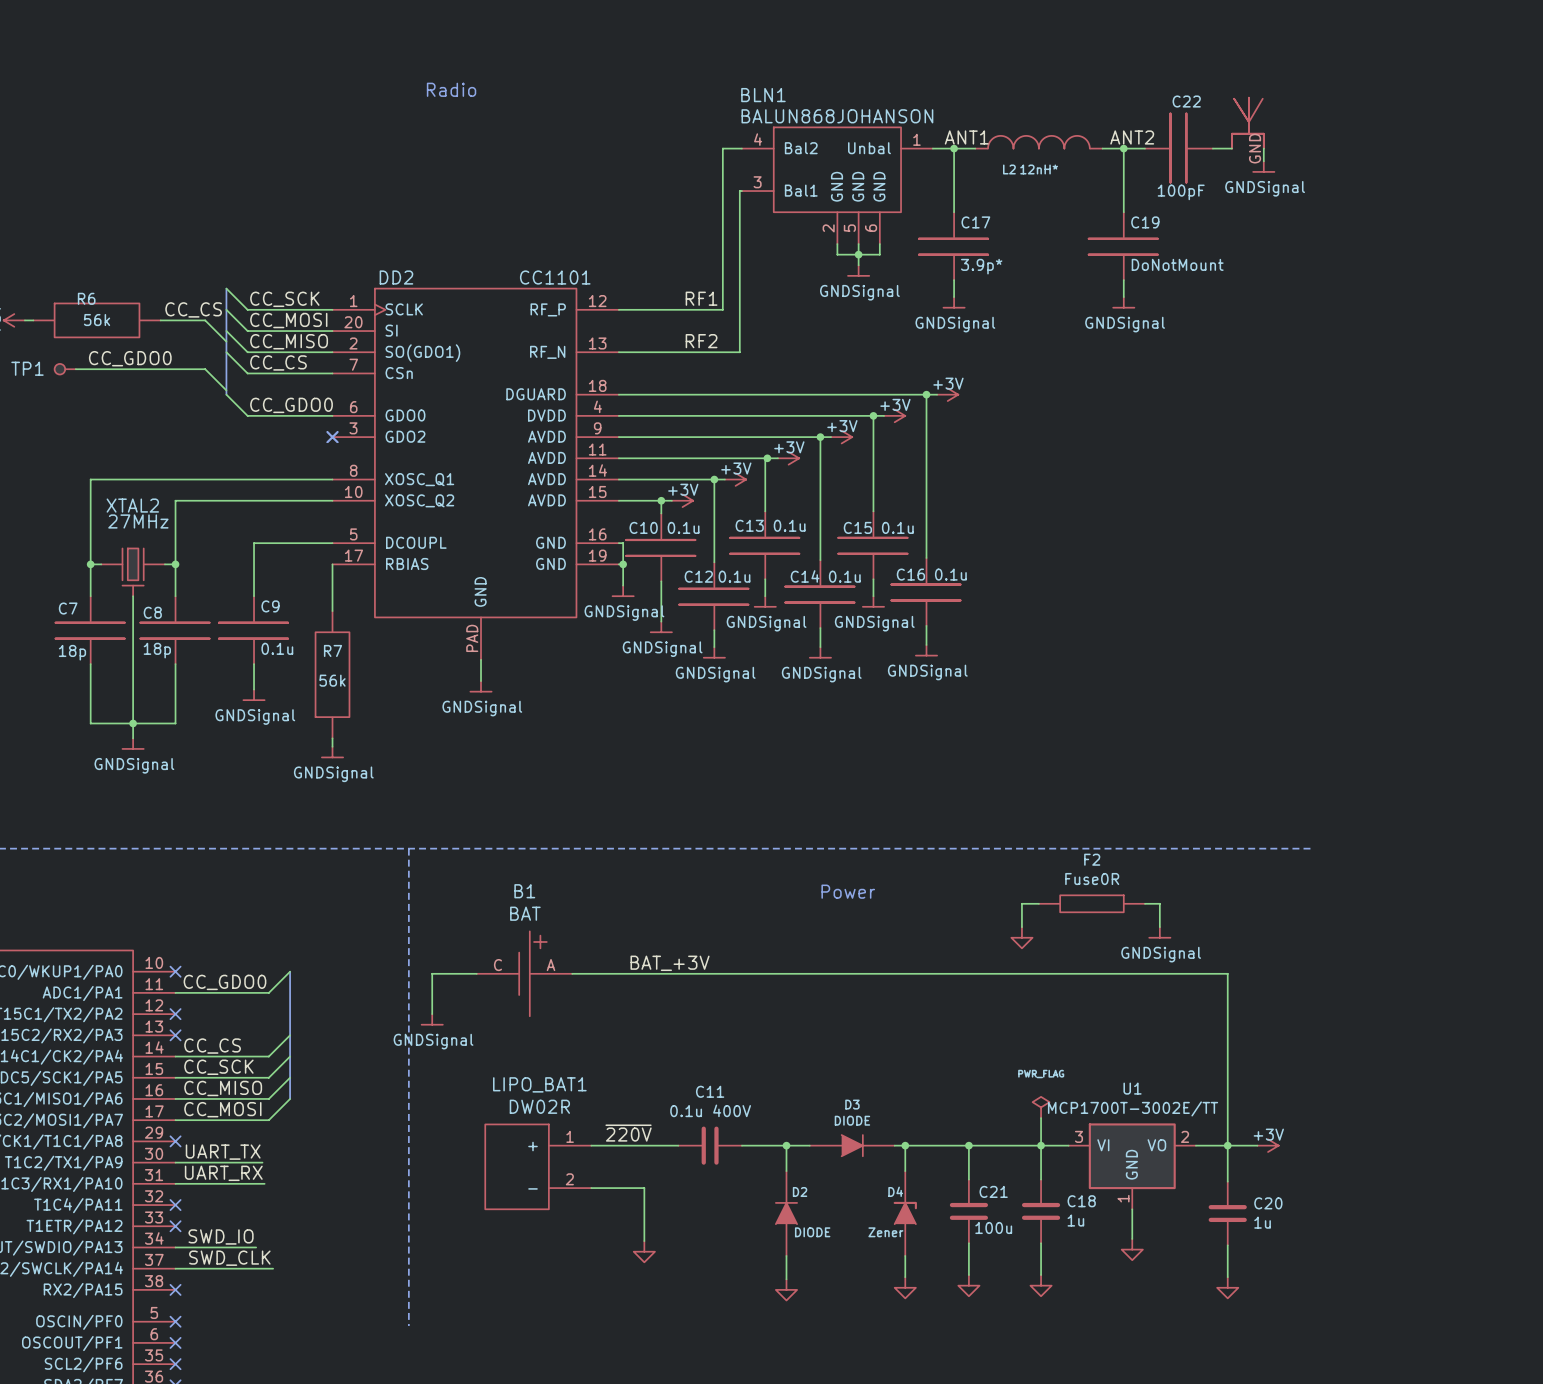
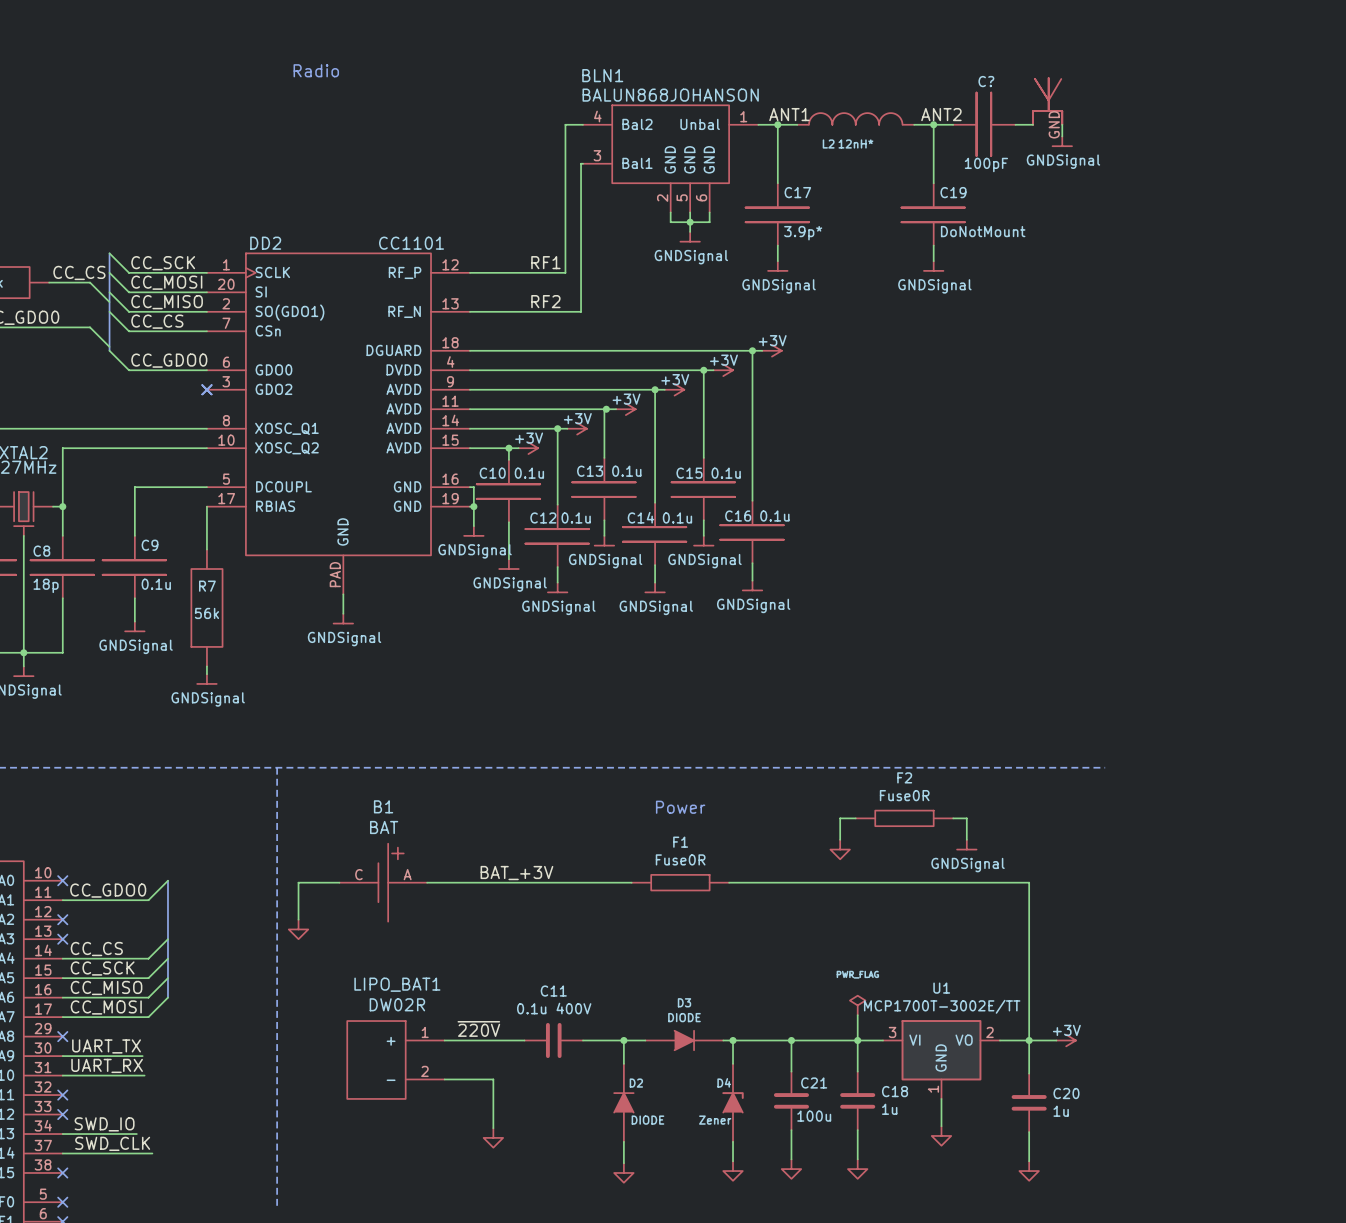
C22 name: C22 (1186, 101) -> C? (986, 81)
wire: (794, 973) (901, 973) -> none
F1: none -> Fuse0R (680, 882)
power symbol shape: [421, 1014, 443, 1025] -> [288, 919, 309, 940]
power symbol text: GNDSignal (433, 1041) -> none

